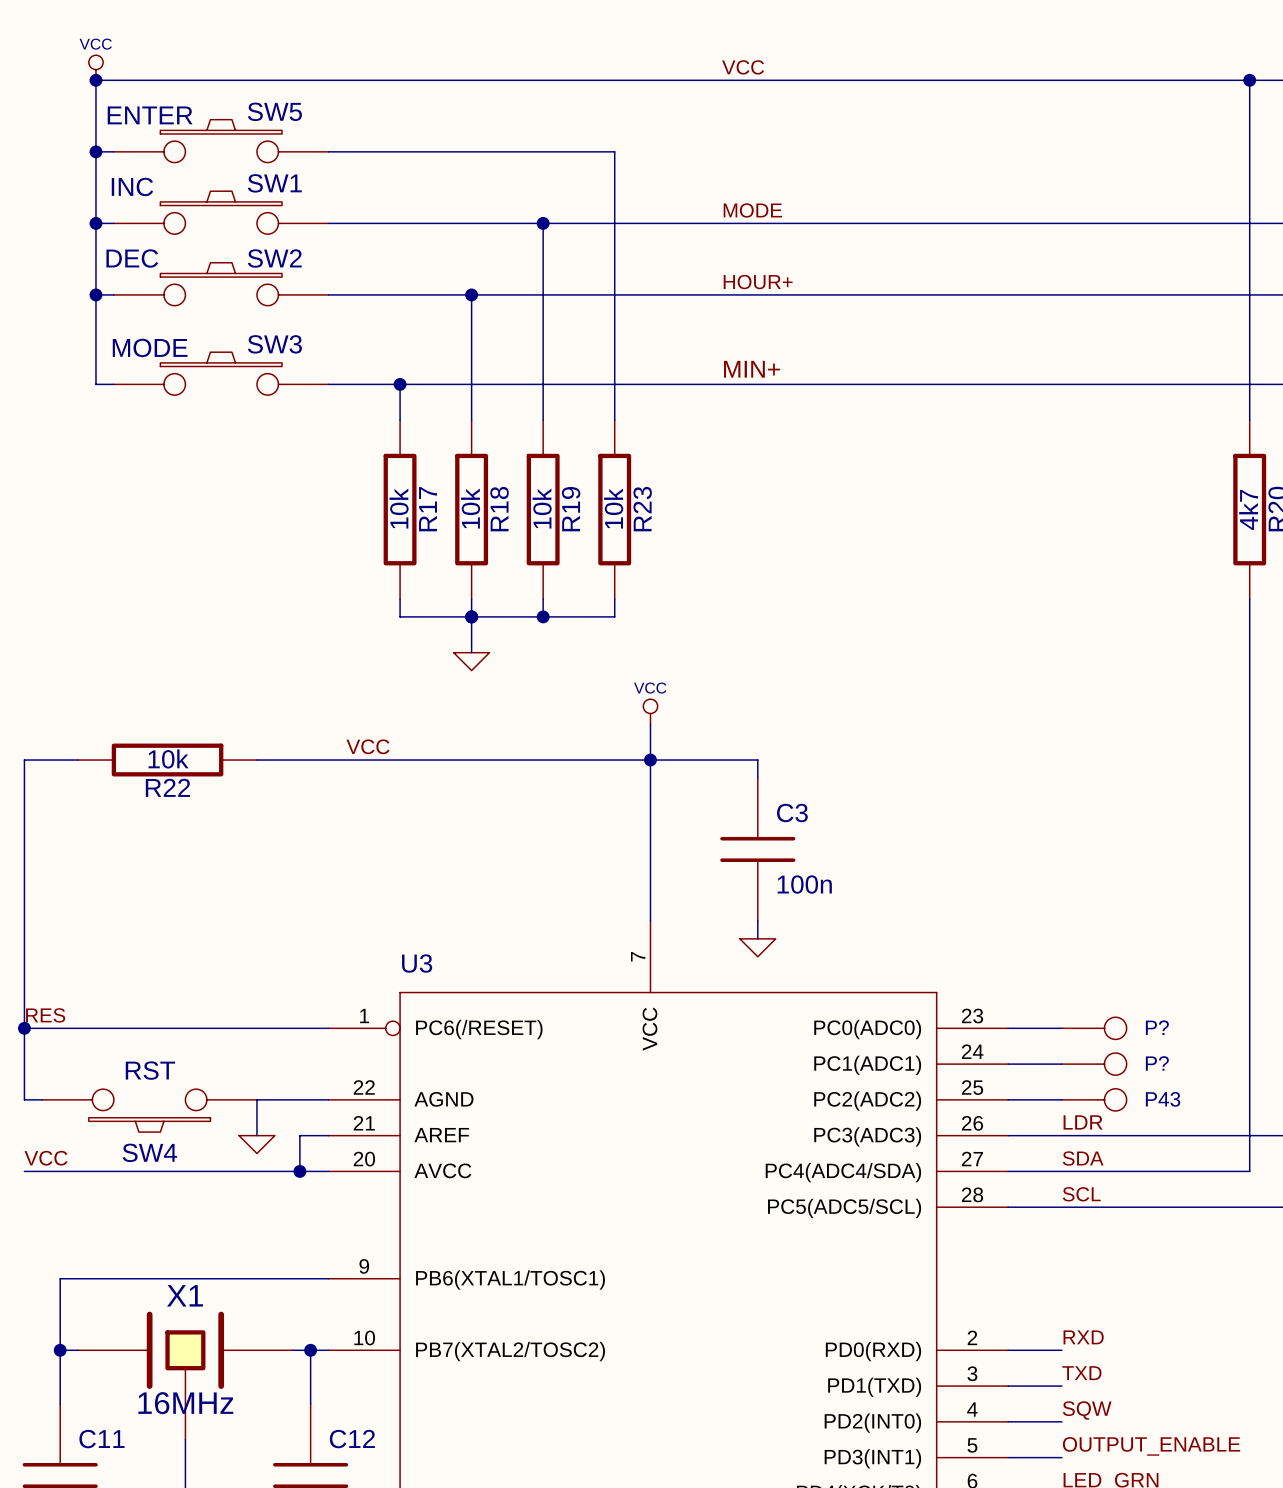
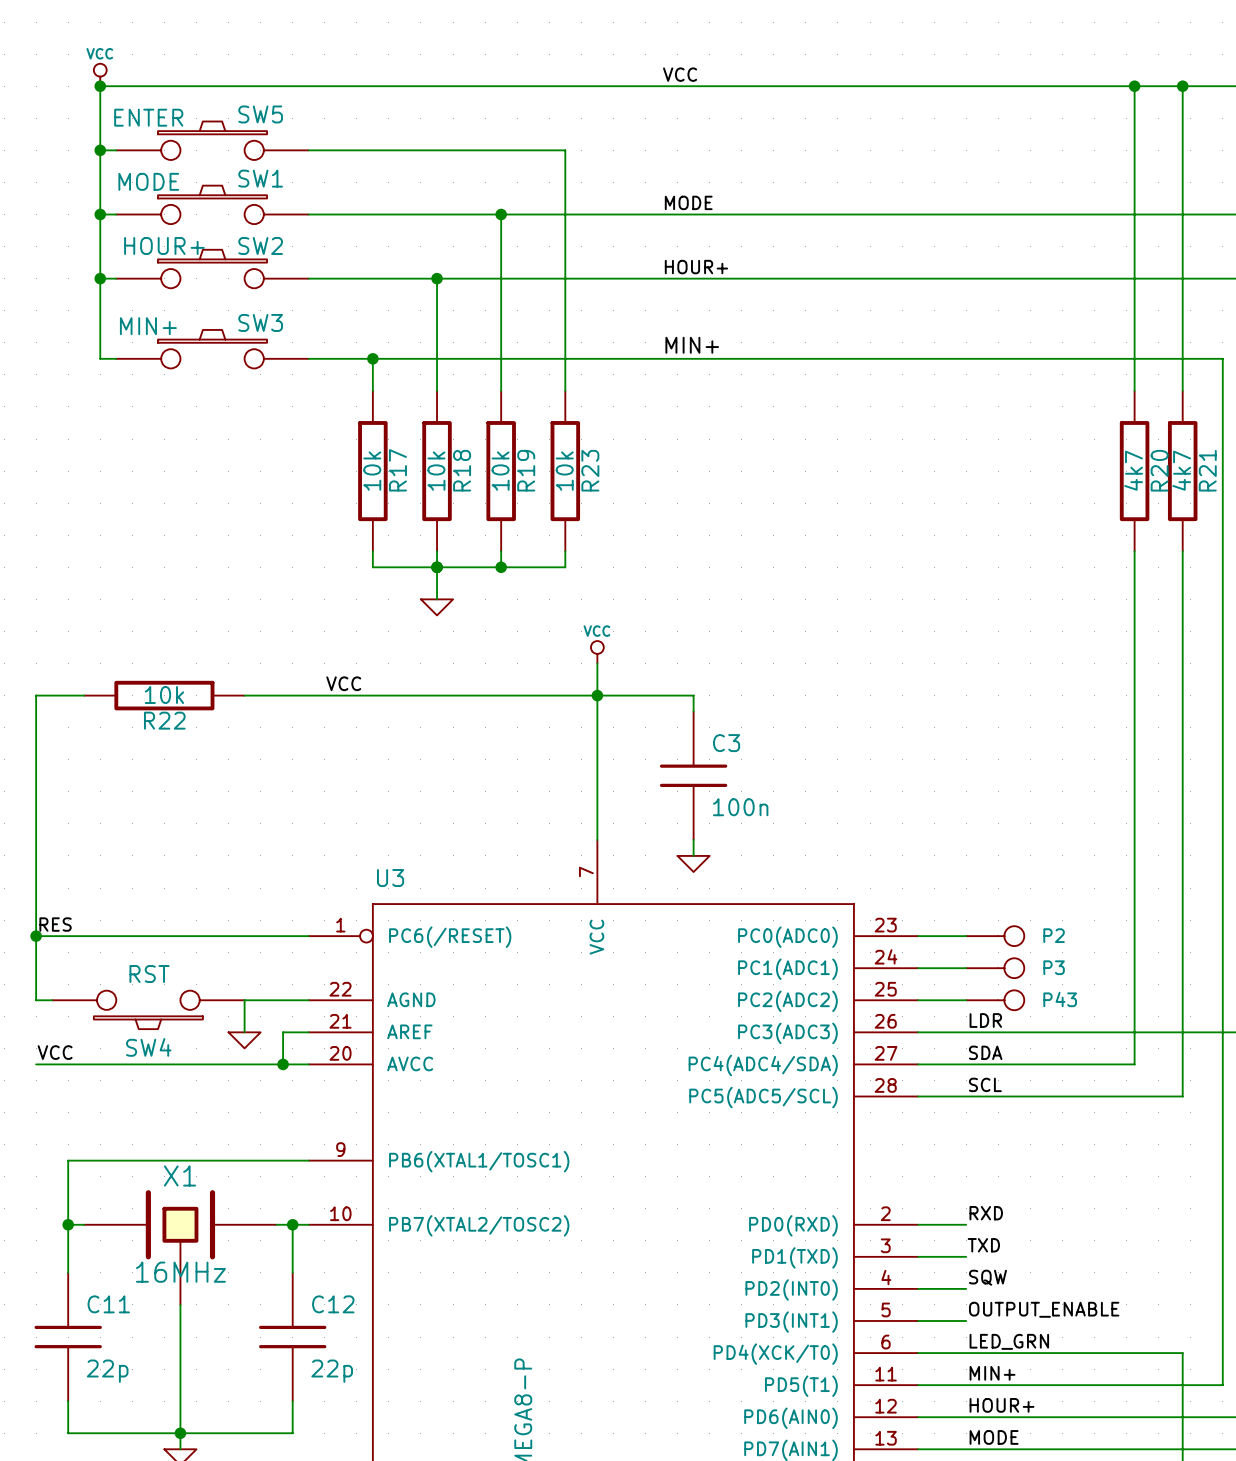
SW1 value: INC (132, 186) -> MODE (148, 181)
SW2 value: DEC (132, 258) -> HOUR+ (164, 245)
SW3 value: MODE (150, 347) -> MIN+ (148, 326)
P? name: P? (1157, 1027) -> P2 (1054, 935)
P? name: P? (1157, 1063) -> P3 (1054, 967)

